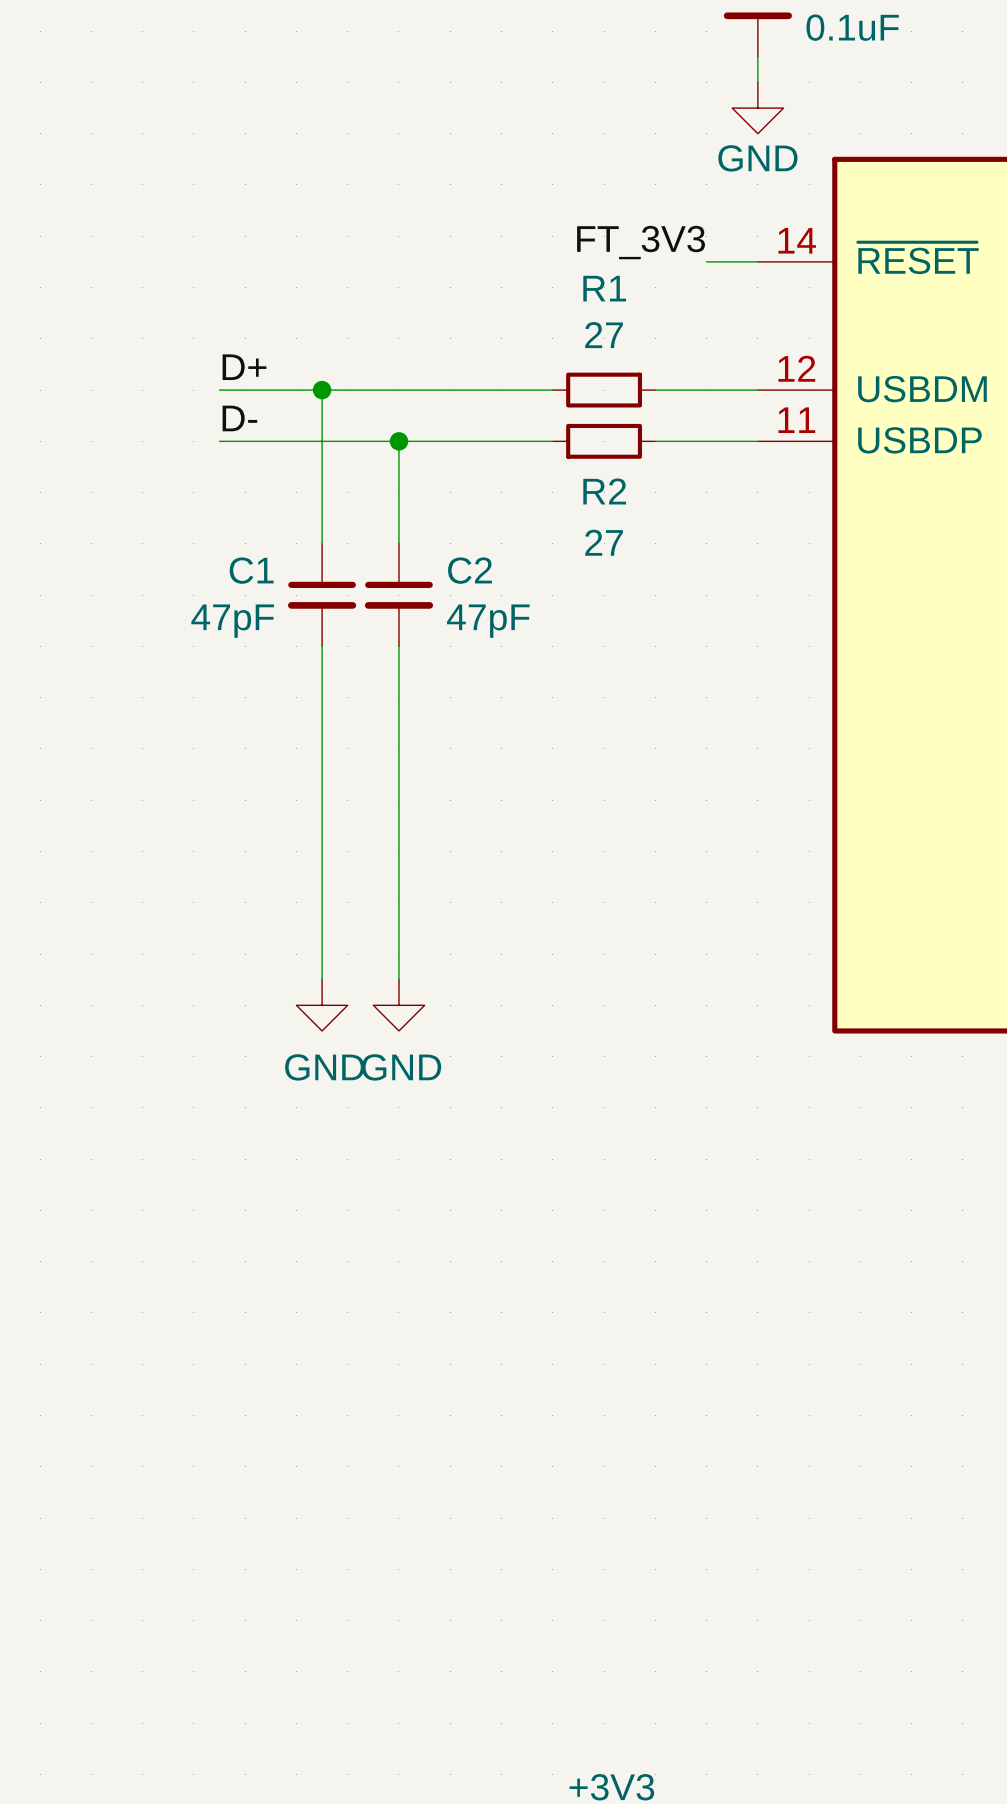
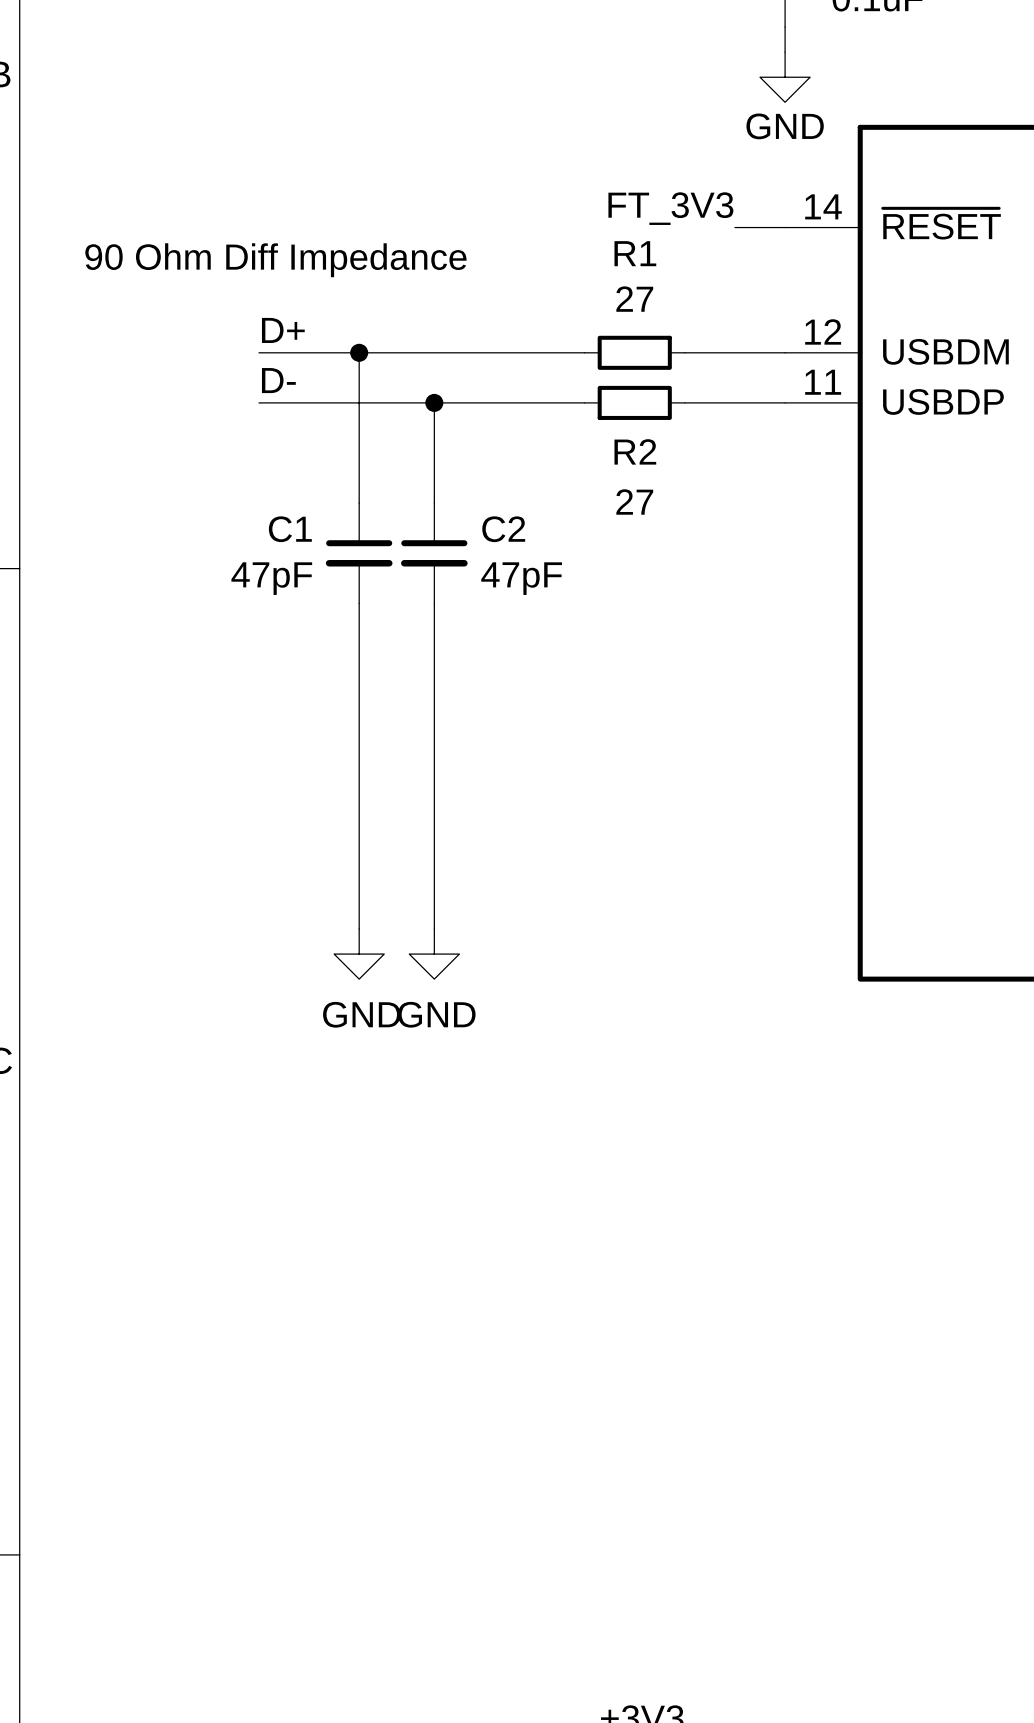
text: none -> 90 Ohm Diff Impedance (275, 260)

